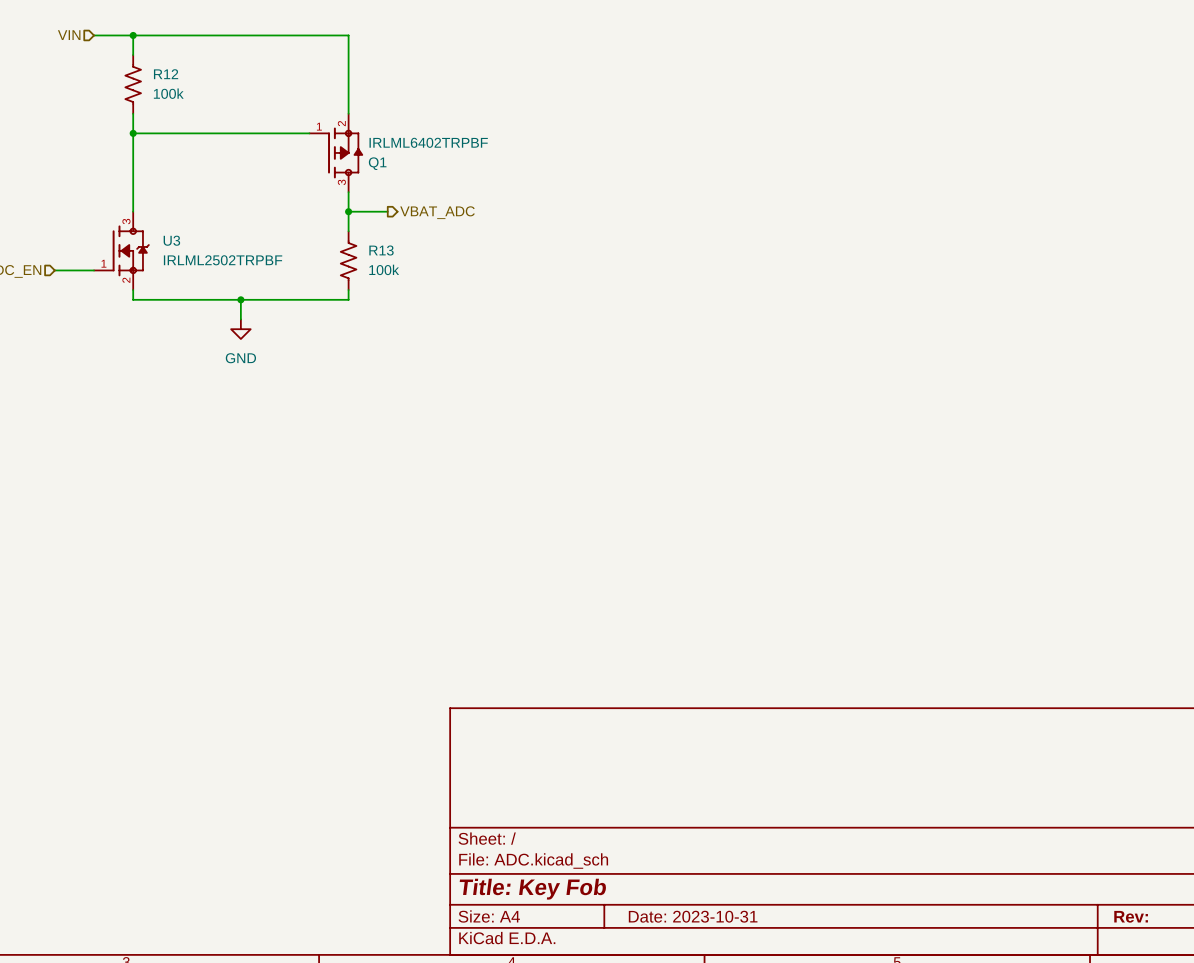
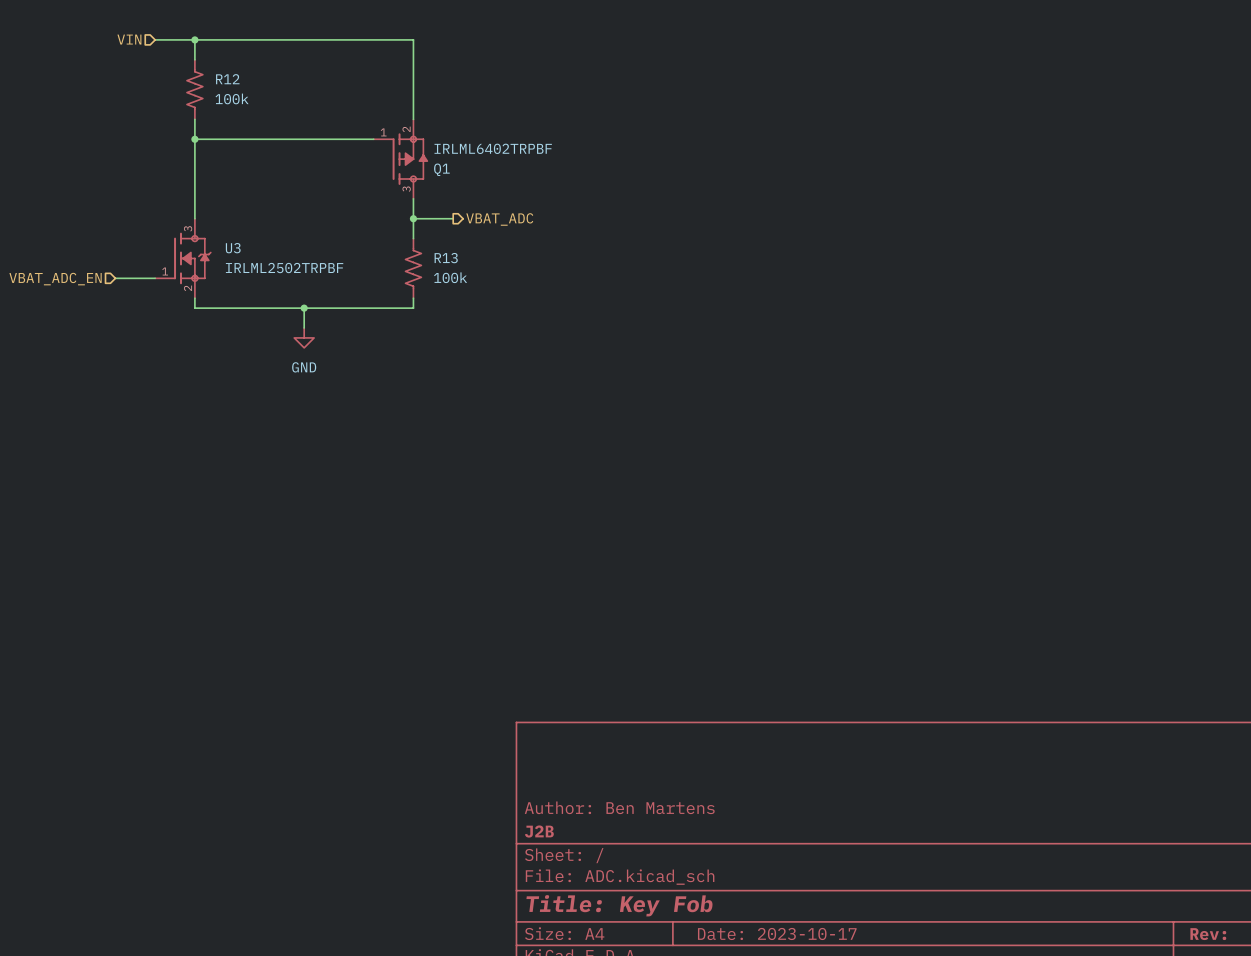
title block: none -> Author: Ben Martens (619, 807)
title block: none -> J2B (539, 831)
title block: Date: 2023-10-31 (693, 916) -> Date: 2023-10-17 (777, 933)

